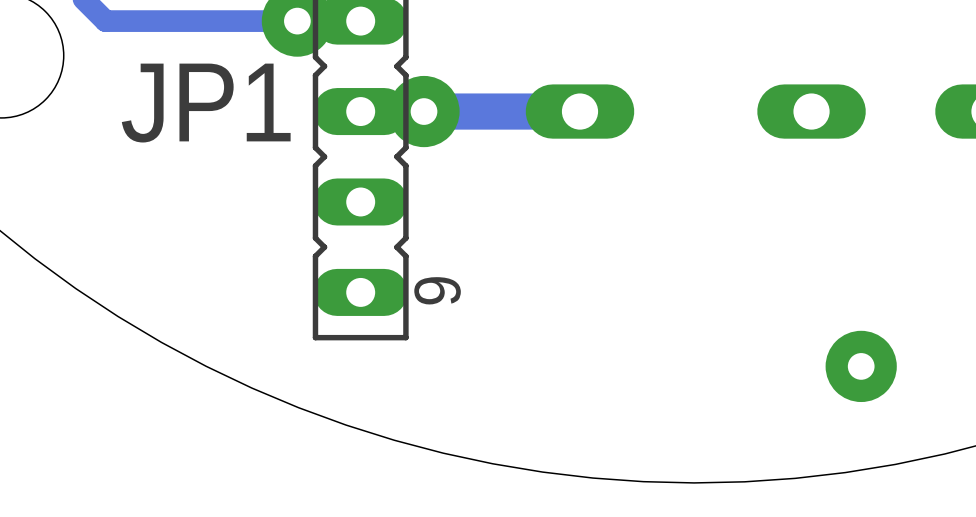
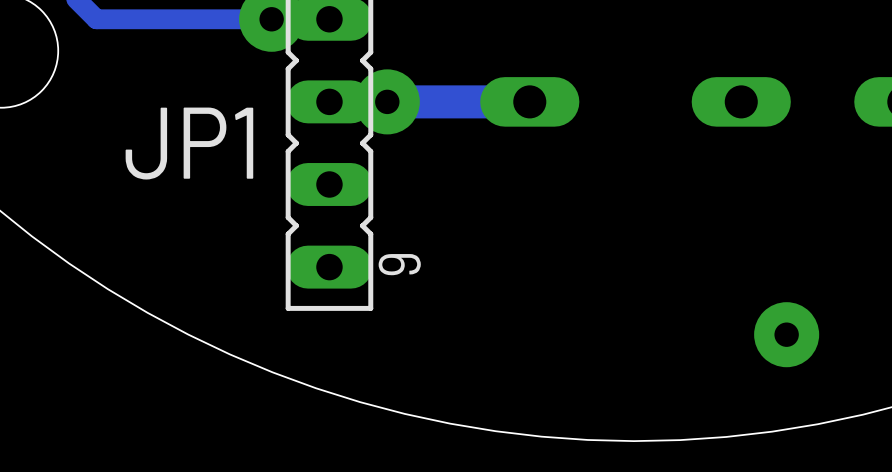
JP1 name position: JP1 (206, 103) -> JP1 (189, 143)

